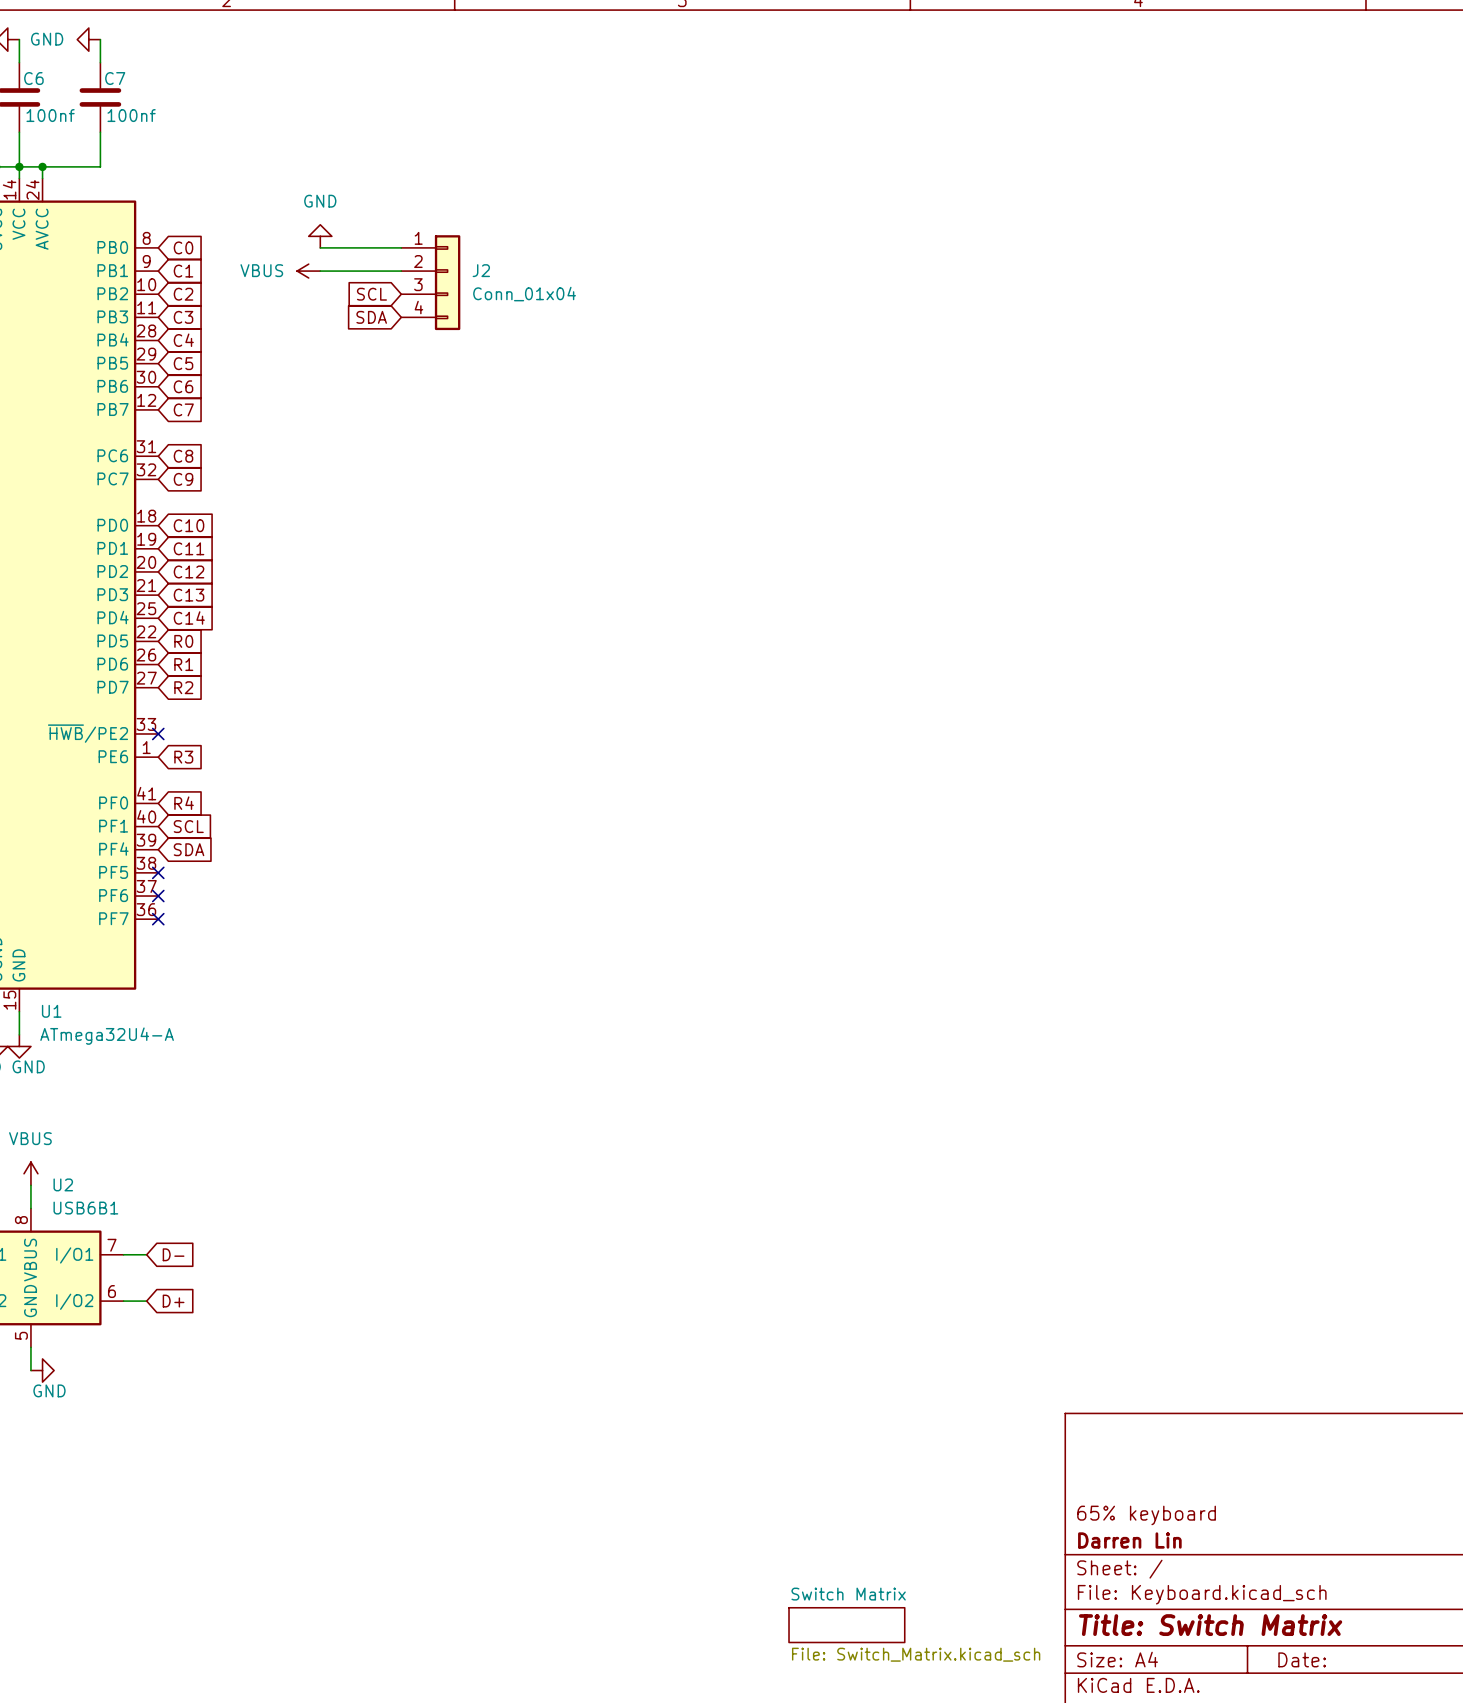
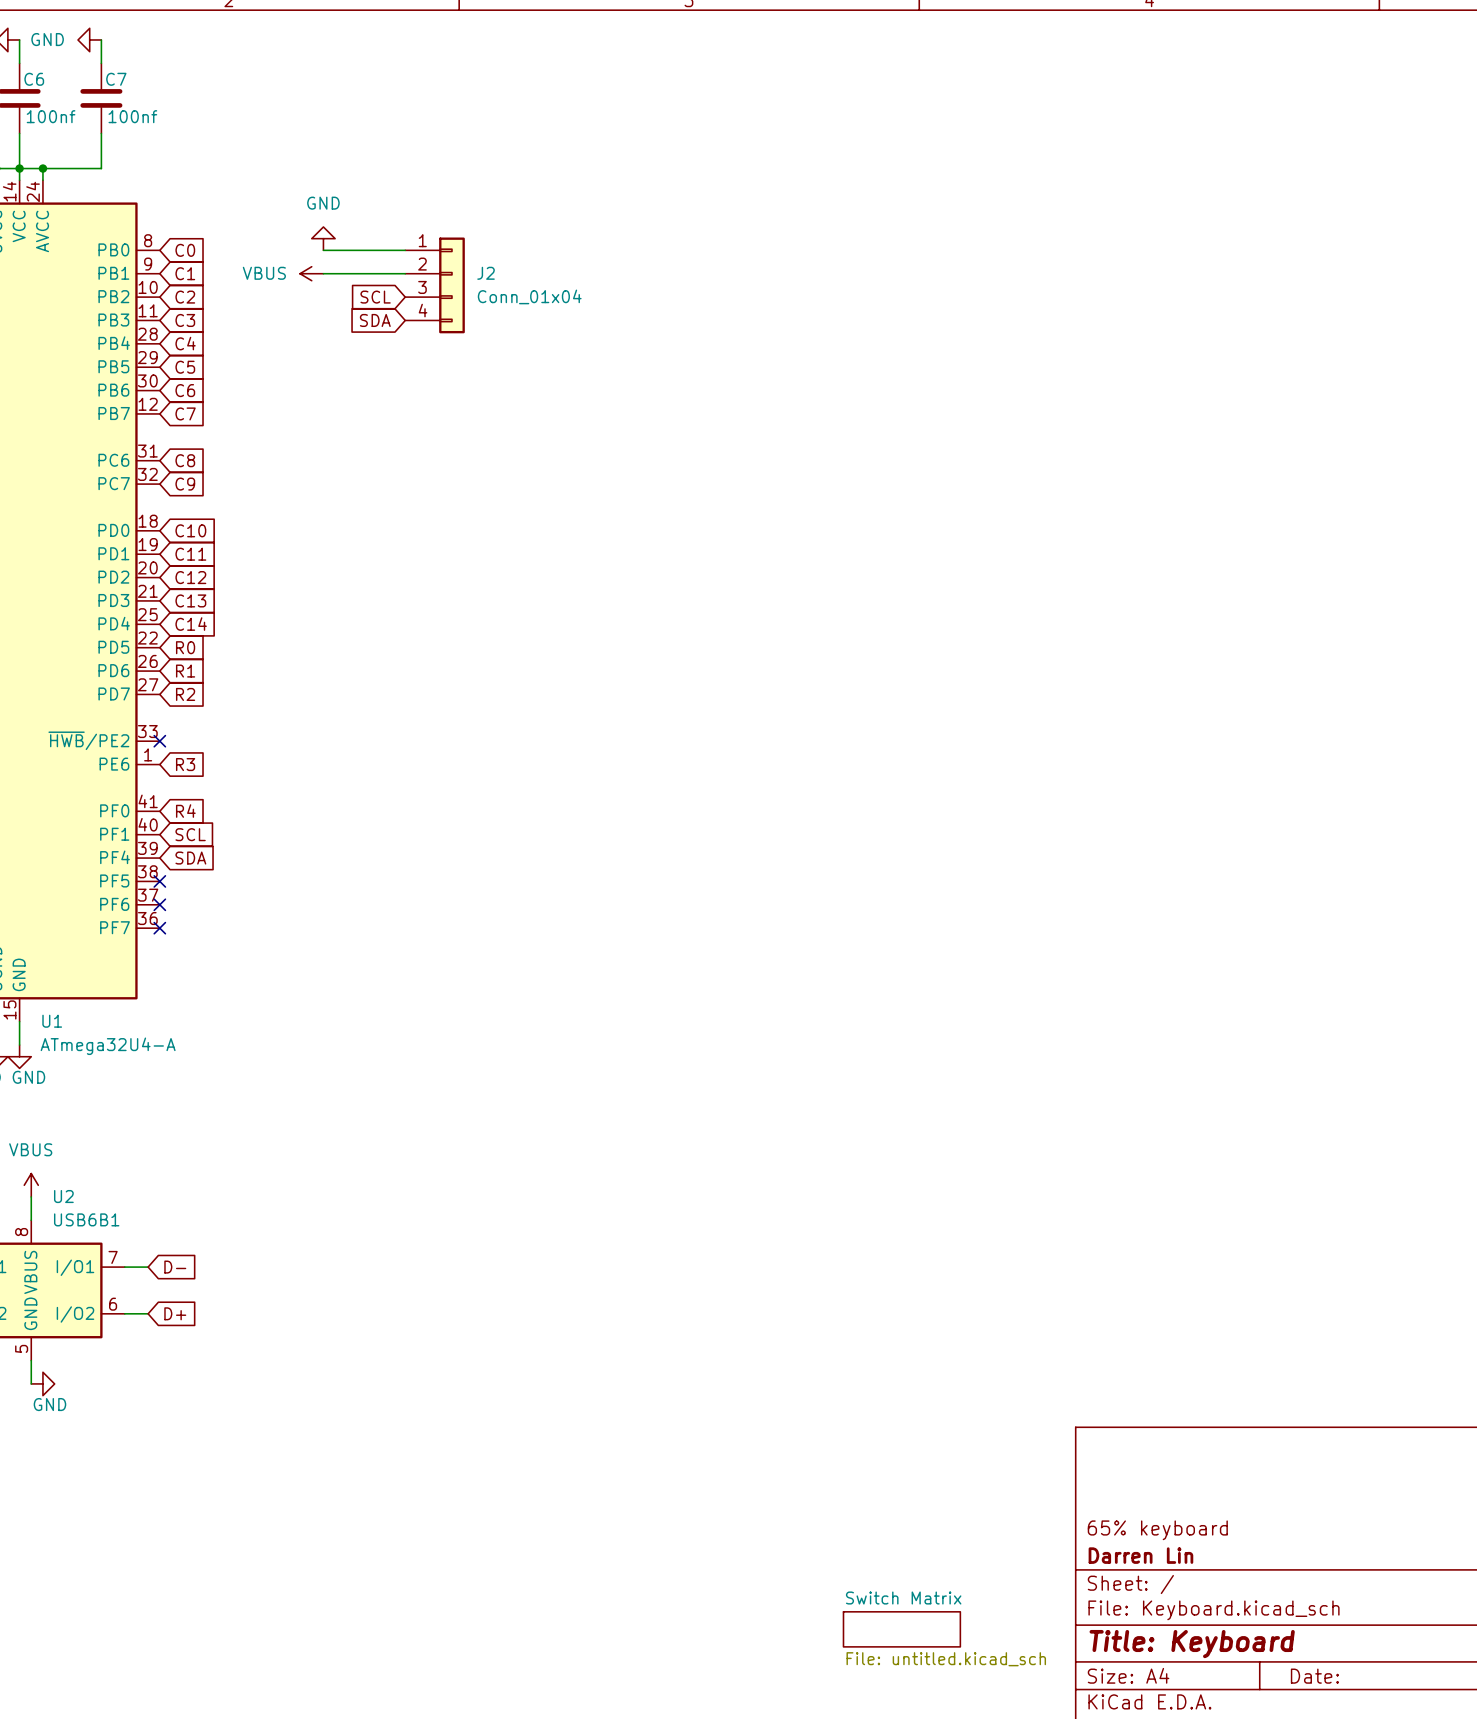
sheet Switch Matrix: none -> File: untitled.kicad_sch (901, 1629)
sheet Switch Matrix: File: Switch_Matrix.kicad_sch (846, 1625) -> none
title block: Title: Switch Matrix (1210, 1625) -> Title: Keyboard (1192, 1644)

